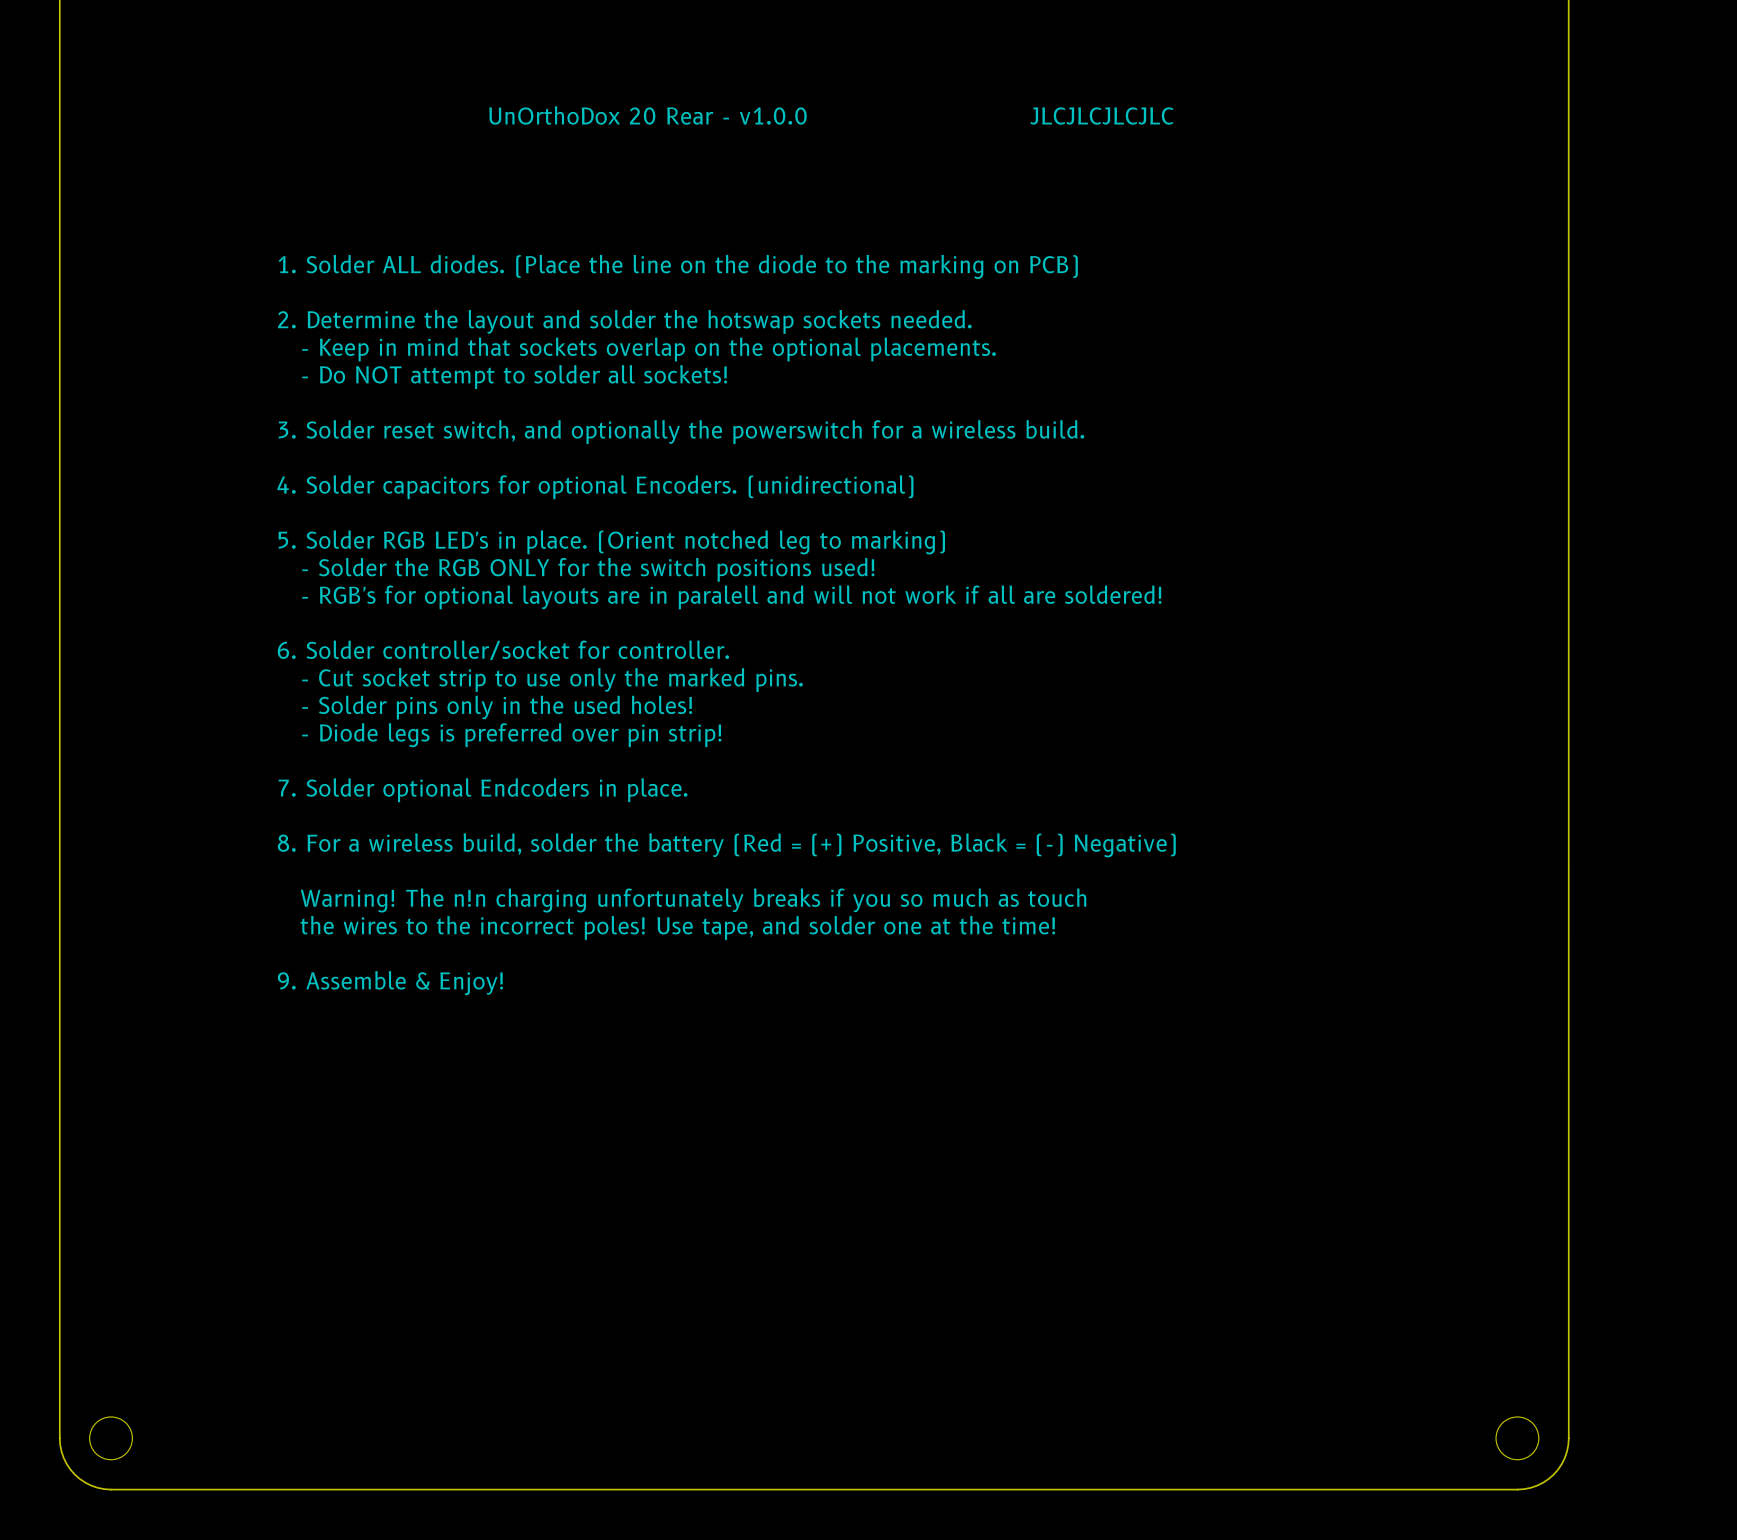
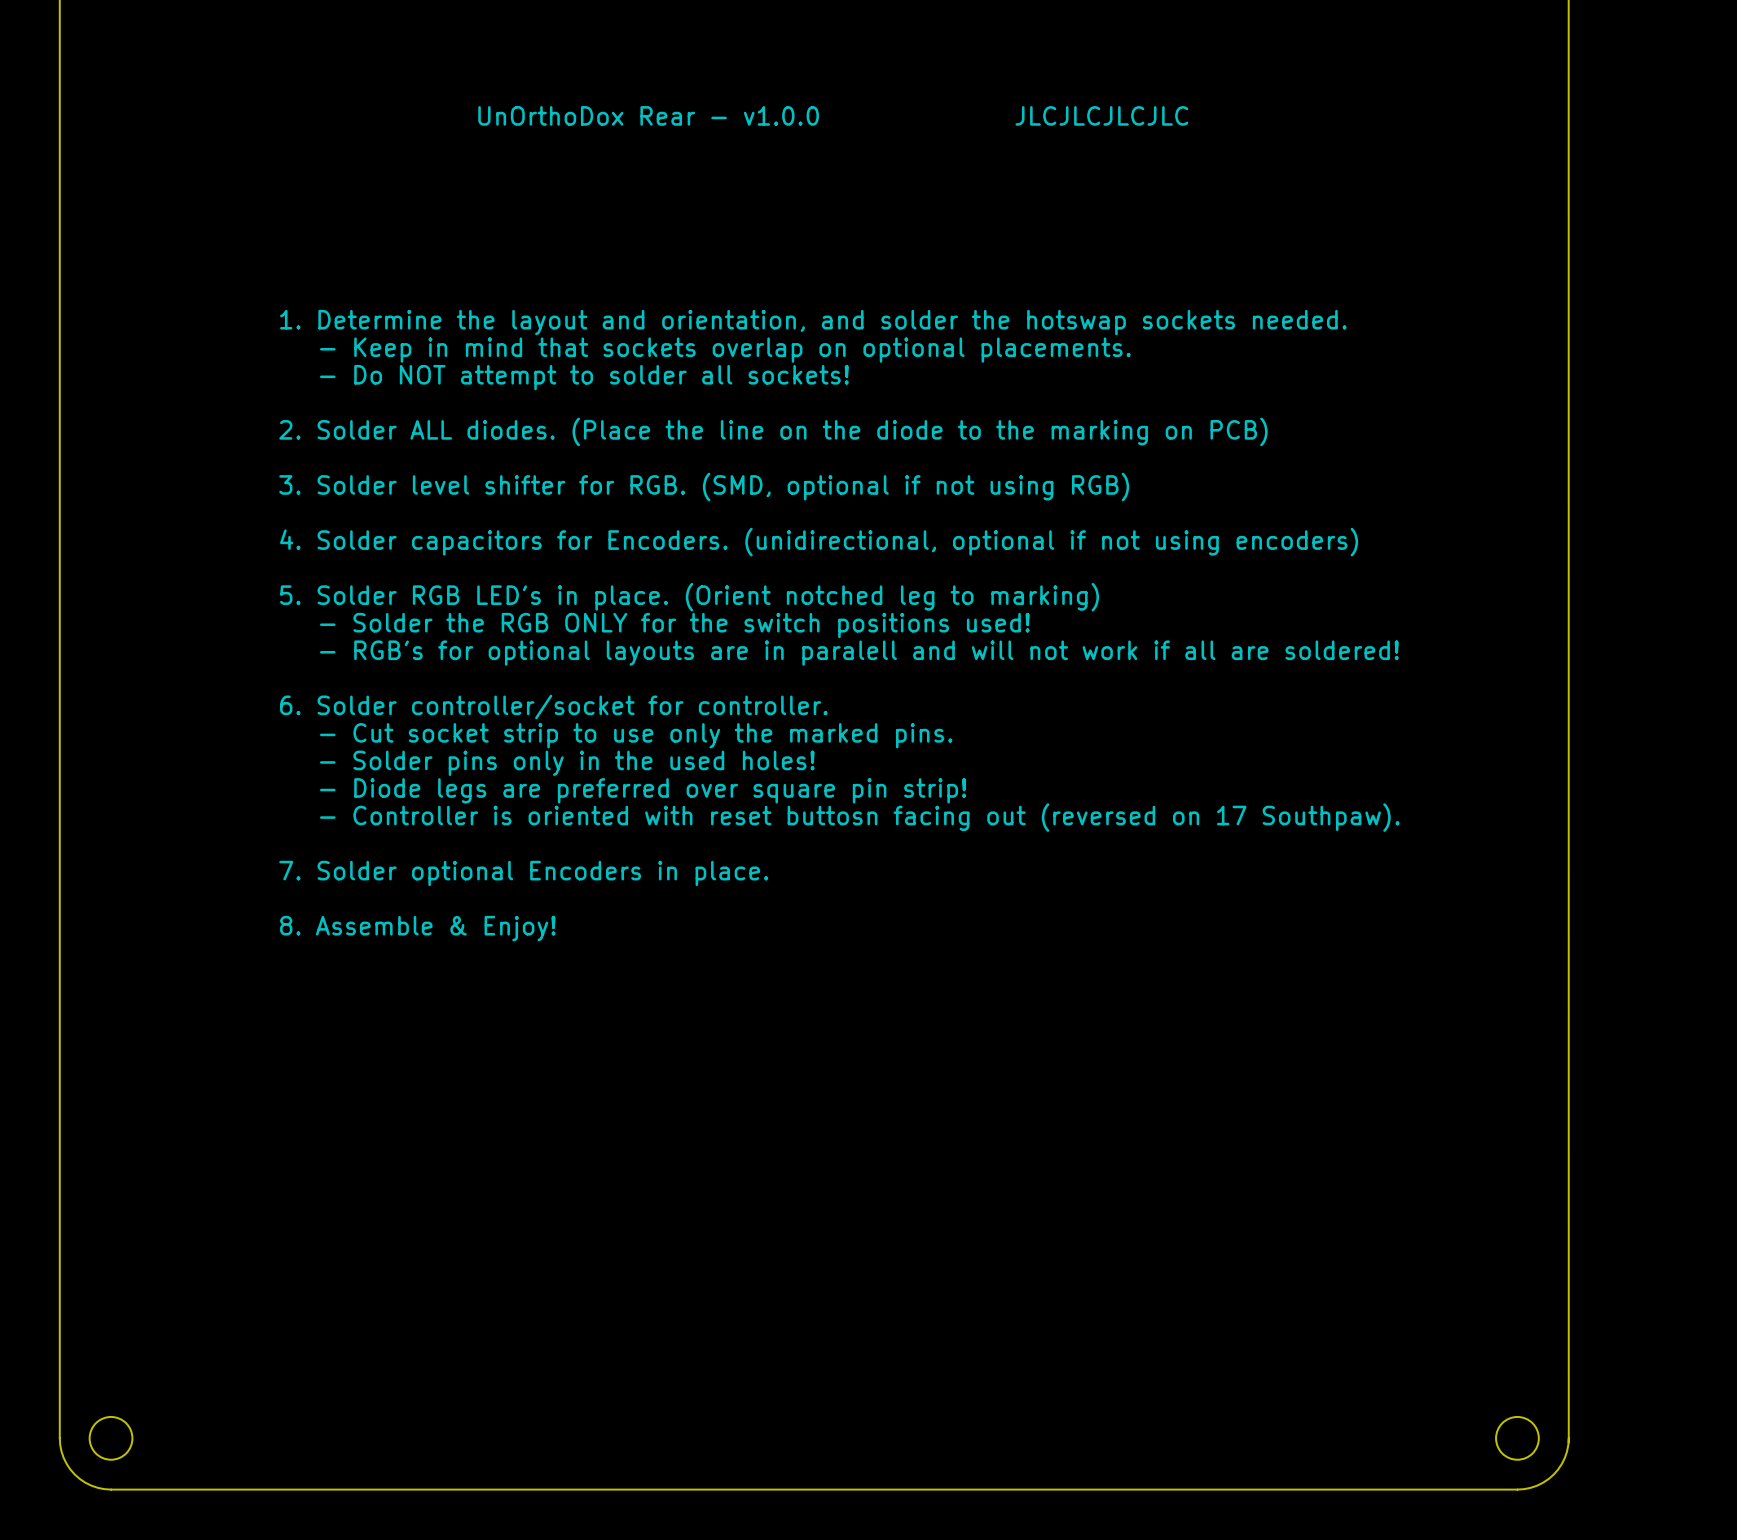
text: UnOrthoDox 20 Rear - v1.0.0 (647, 115) -> UnOrthoDox Rear - v1.0.0 (648, 115)
text: 1. Solder ALL diodes. (Place the line on the diode to the marking on PCB) (678, 266) -> none
text: 2. Determine the layout and solder the hotswap sockets needed. (624, 321) -> 1. Determine the layout and orientation, and solder the hotswap sockets needed. (813, 322)
text: - Keep in mind that sockets overlap on the optional placements. (649, 349) -> - Keep in mind that sockets overlap on optional placements. (725, 350)
text: 3. Solder reset switch, and optionally the powerswitch for a wireless build. (681, 432) -> 2. Solder ALL diodes. (Place the line on the diode to the marking on PCB) (773, 431)
text: 4. Solder capacitors for optional Encoders. (unidirectional) (595, 487) -> 3. Solder level shifter for RGB. (SMD, optional if not using RGB) (704, 487)
text: 5. Solder RGB LED's in place. (Orient notched leg to marking) (611, 542) -> 4. Solder capacitors for Encoders. (unidirectional, optional if not using encoders) (819, 542)
text position: - Solder the RGB ONLY for the switch positions used! (588, 569) -> - Solder the RGB ONLY for the switch positions used! (674, 625)
text: - RGB's for optional layouts are in paralell and will not work if all are soldered! (731, 597) -> 5. Solder RGB LED's in place. (Orient notched leg to marking) (689, 597)
text: 6. Solder controller/socket for controller. (503, 650) -> - RGB's for optional layouts are in paralell and will not work if all are soldered! (859, 653)
text: - Cut socket strip to use only the marked pins. (552, 680) -> none
text: - Solder pins only in the used holes! (497, 707) -> 6. Solder controller/socket for controller. (553, 706)
text: - Diode legs is preferred over pin strip! (511, 735) -> - Cut socket strip to use only the marked pins. (636, 735)
text: none -> - Solder pins only in the used holes! (567, 763)
text: 7. Solder optional Endcoders in place. (483, 790) -> - Diode legs are preferred over square pin strip! (643, 790)
text: none -> - Controller is oriented with reset buttosn facing out (reversed on 17 Southpaw). (859, 817)
text: 8. For a wireless build, solder the battery (Red = (+) Positive, Black = (-) Negative) (726, 845) -> none
text: none -> 7. Solder optional Encoders in place. (523, 873)
text: Warning! The n!n charging unfortunately breaks if you so much as touch (693, 900) -> none
text: the wires to the incorrect poles! Use tape, and solder one at the time! (677, 927) -> 8. Assemble & Enjoy! (417, 928)
text: 9. Assemble & Enjoy! (390, 983) -> none

